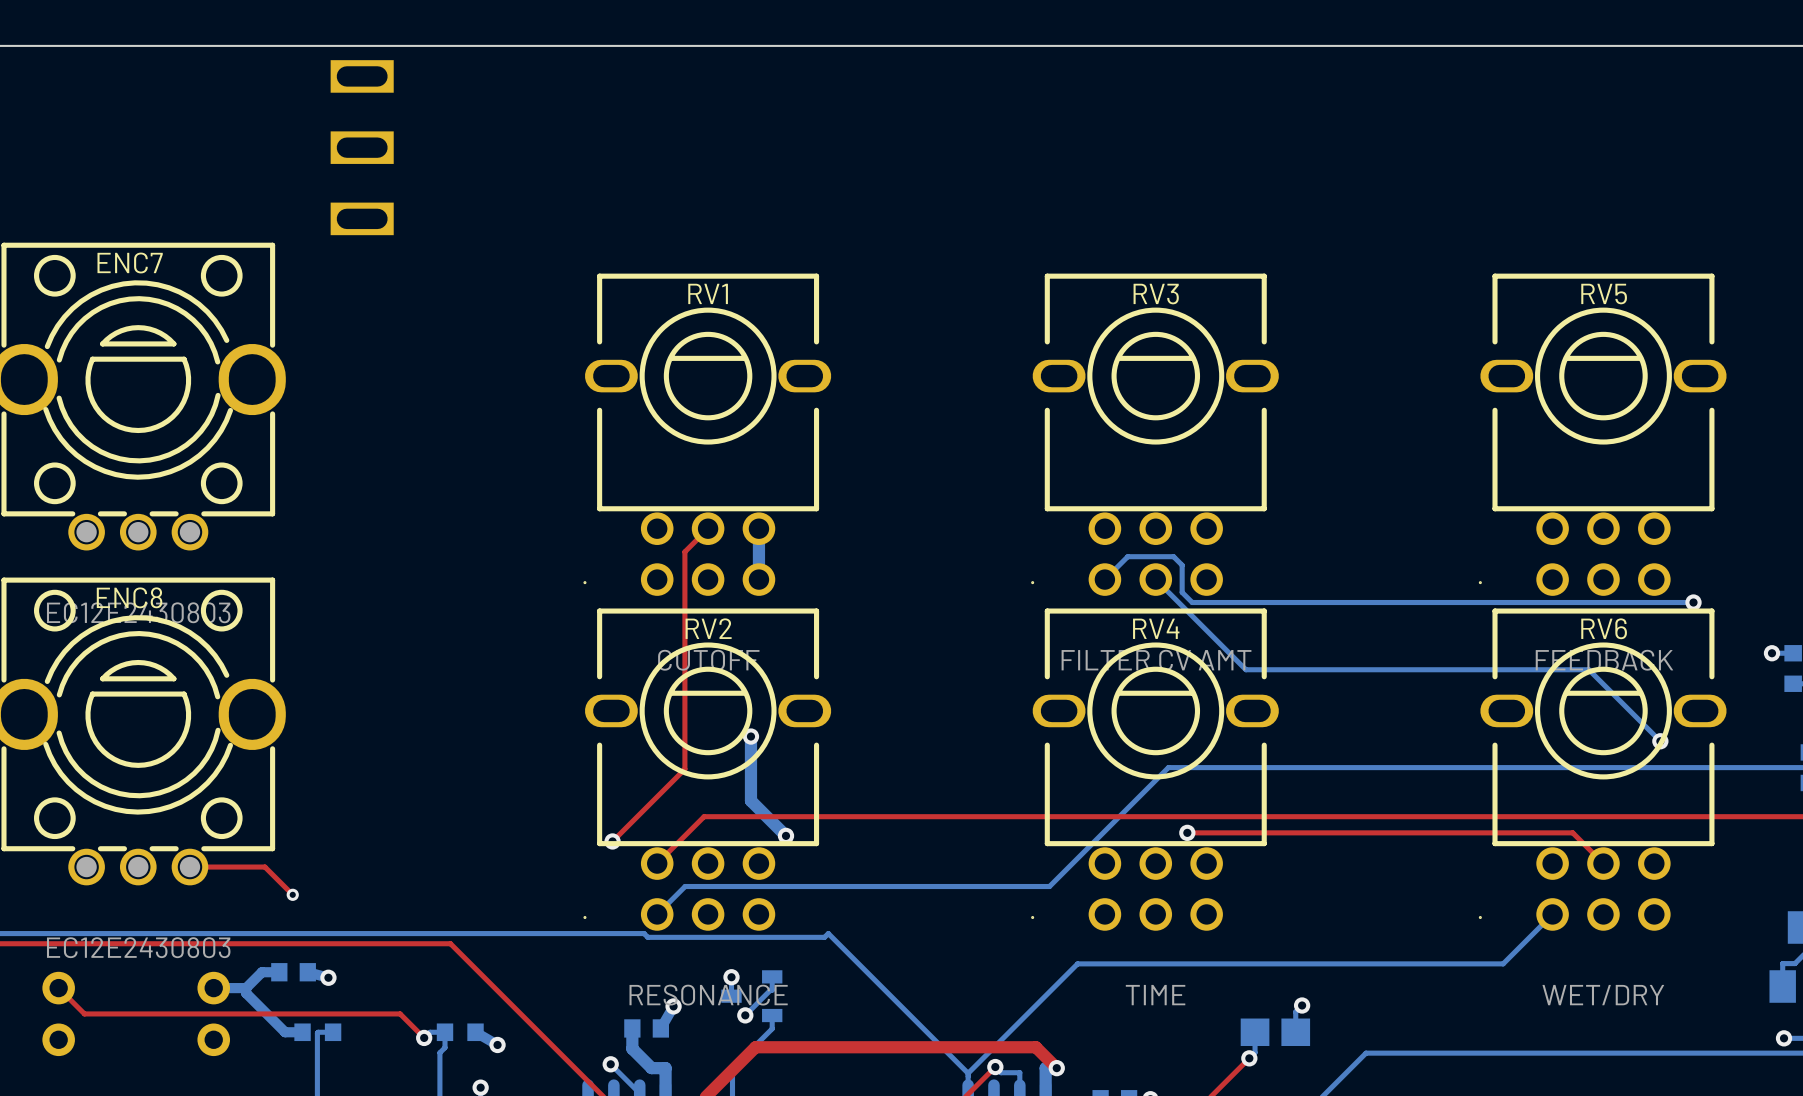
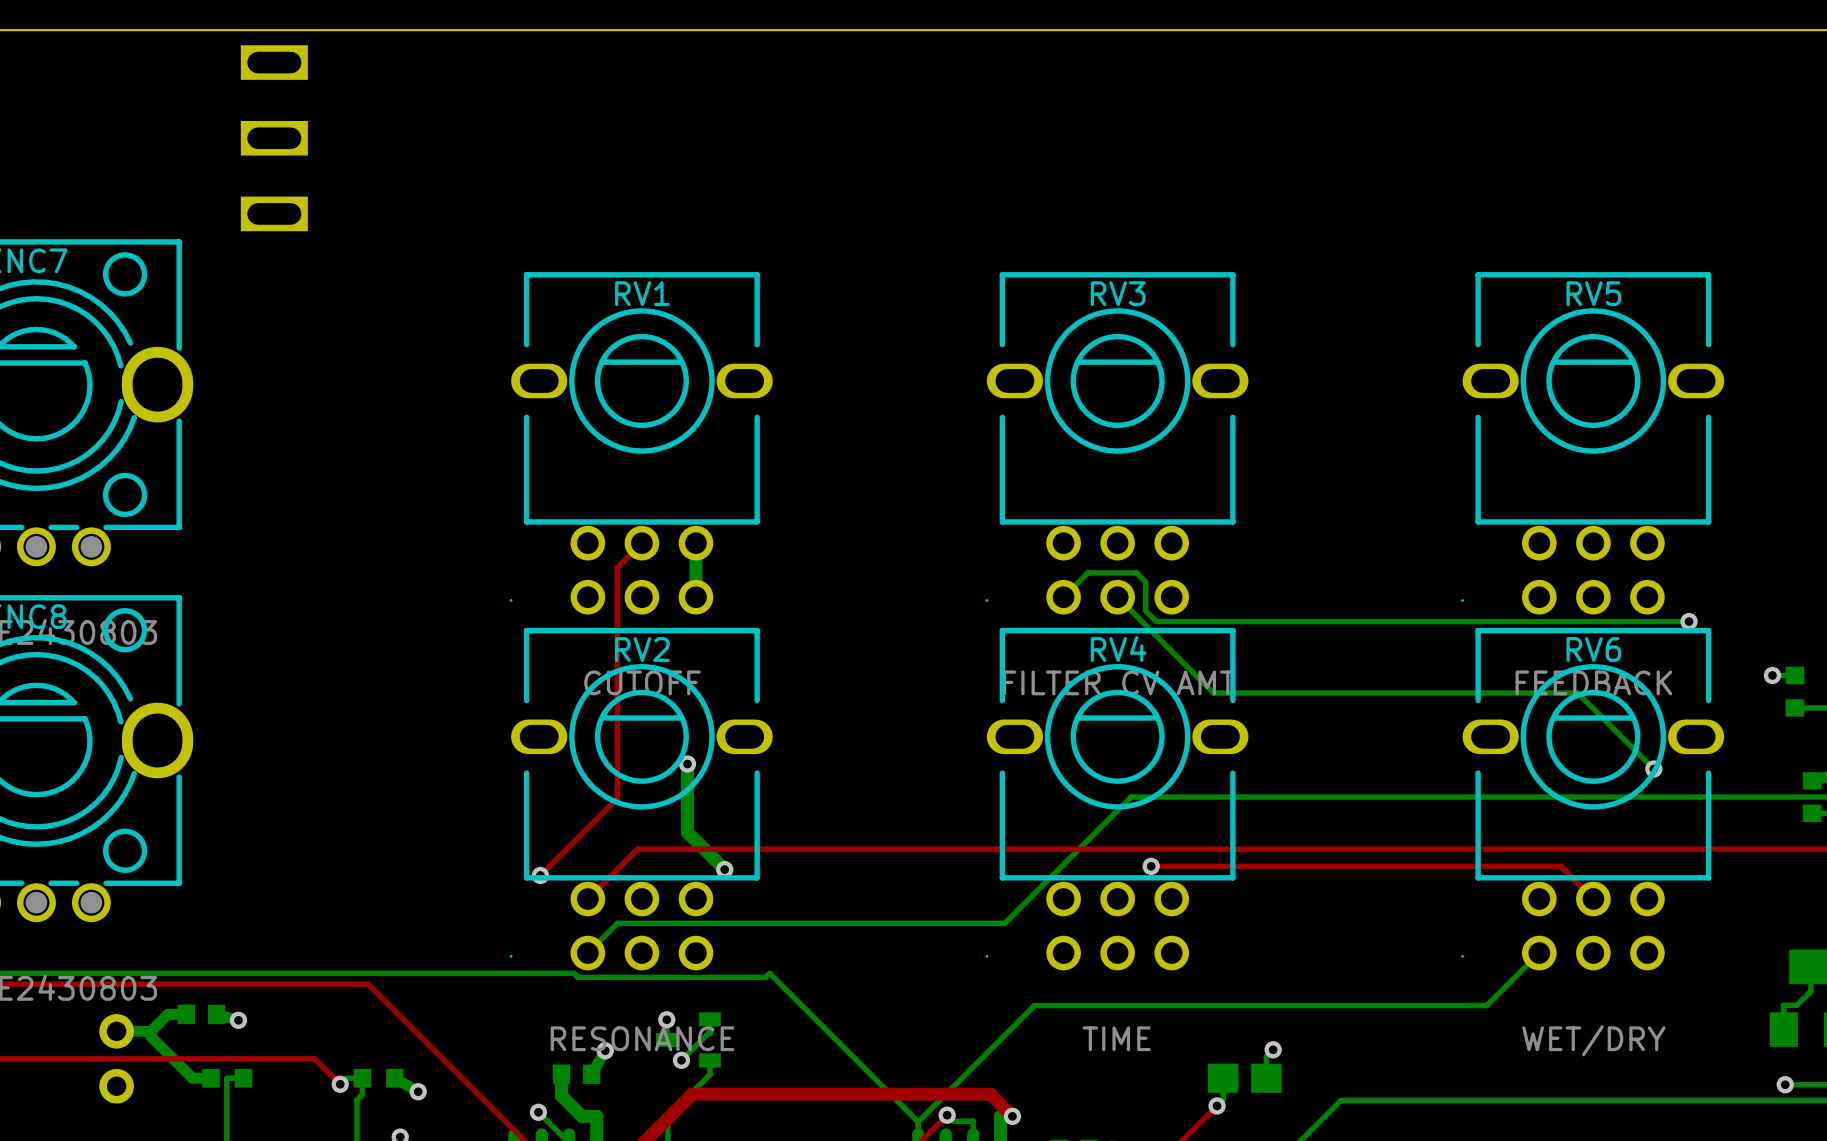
top track: (189, 867) (264, 867) (292, 894) -> none
via: (292, 894) -> none

